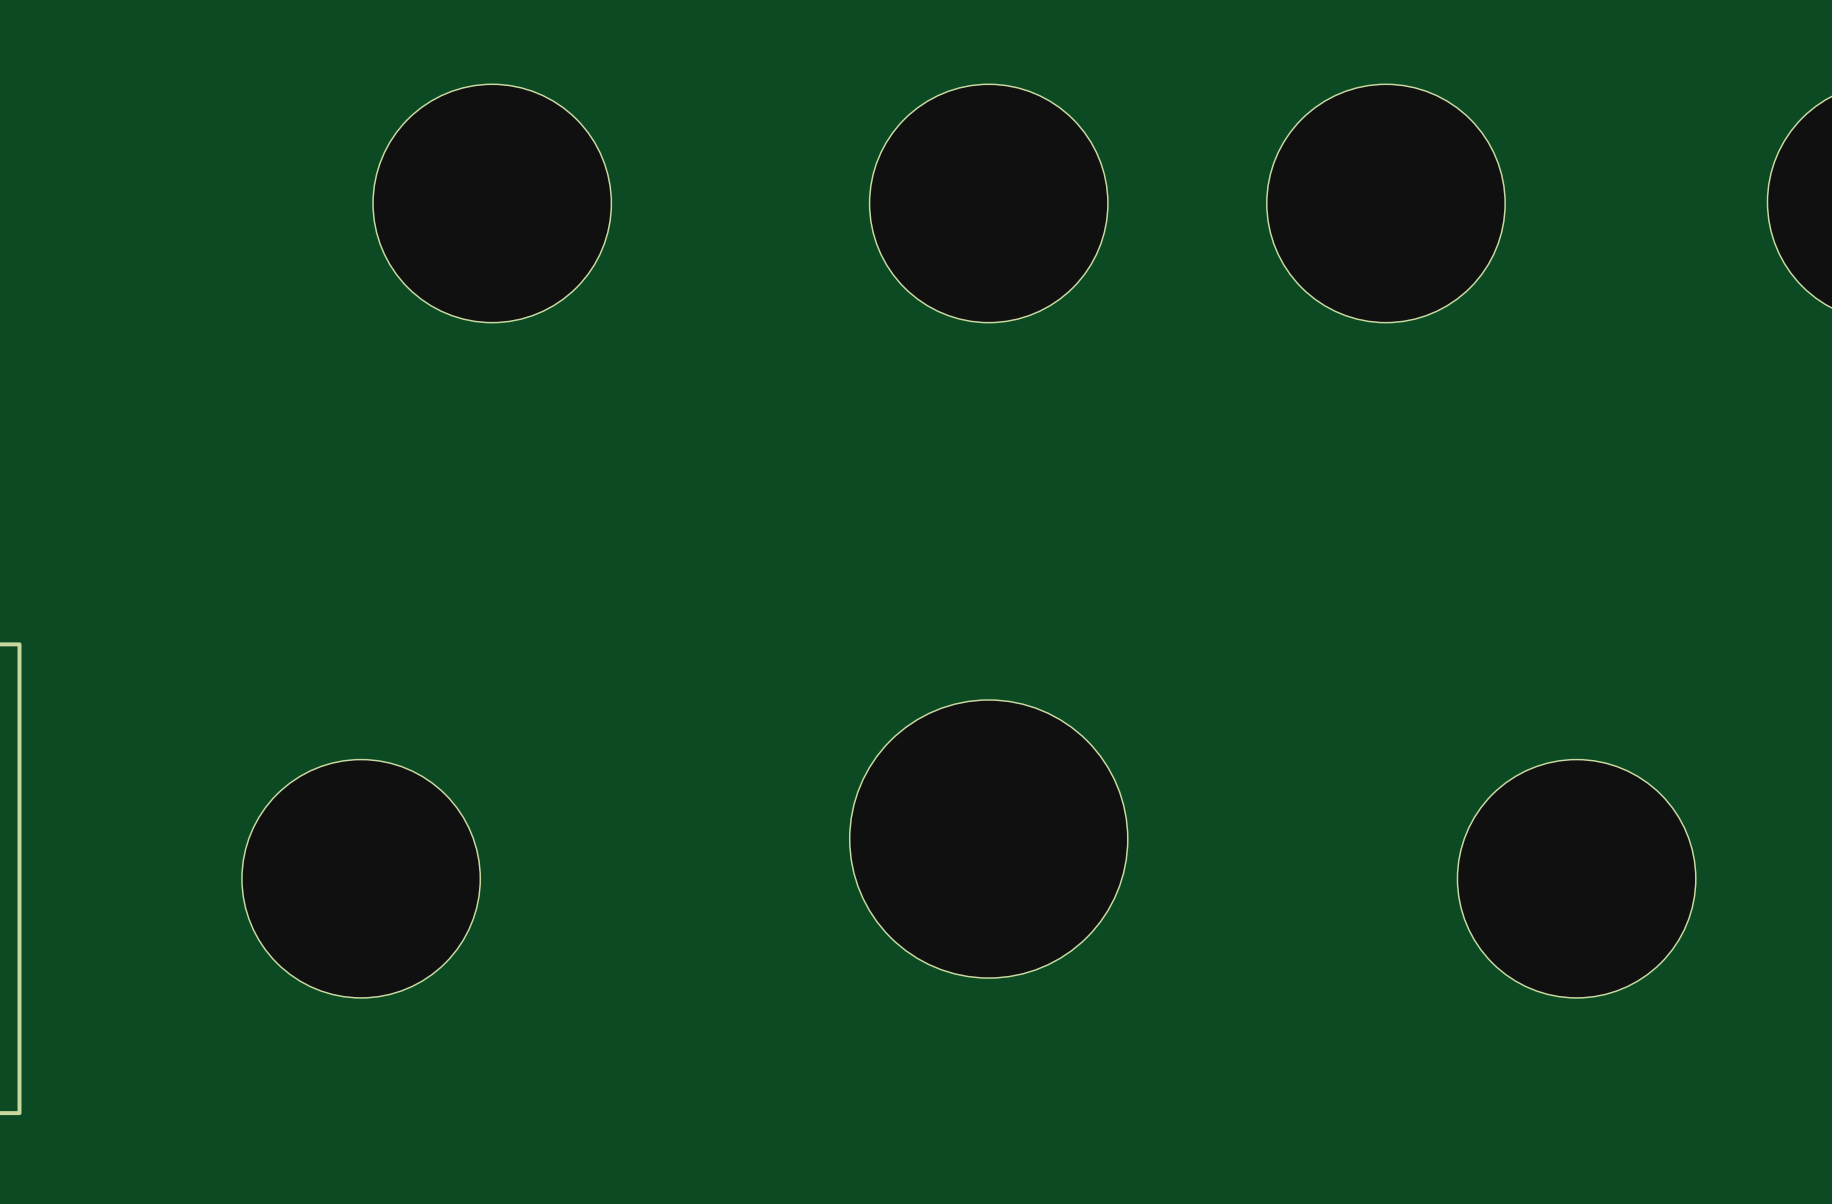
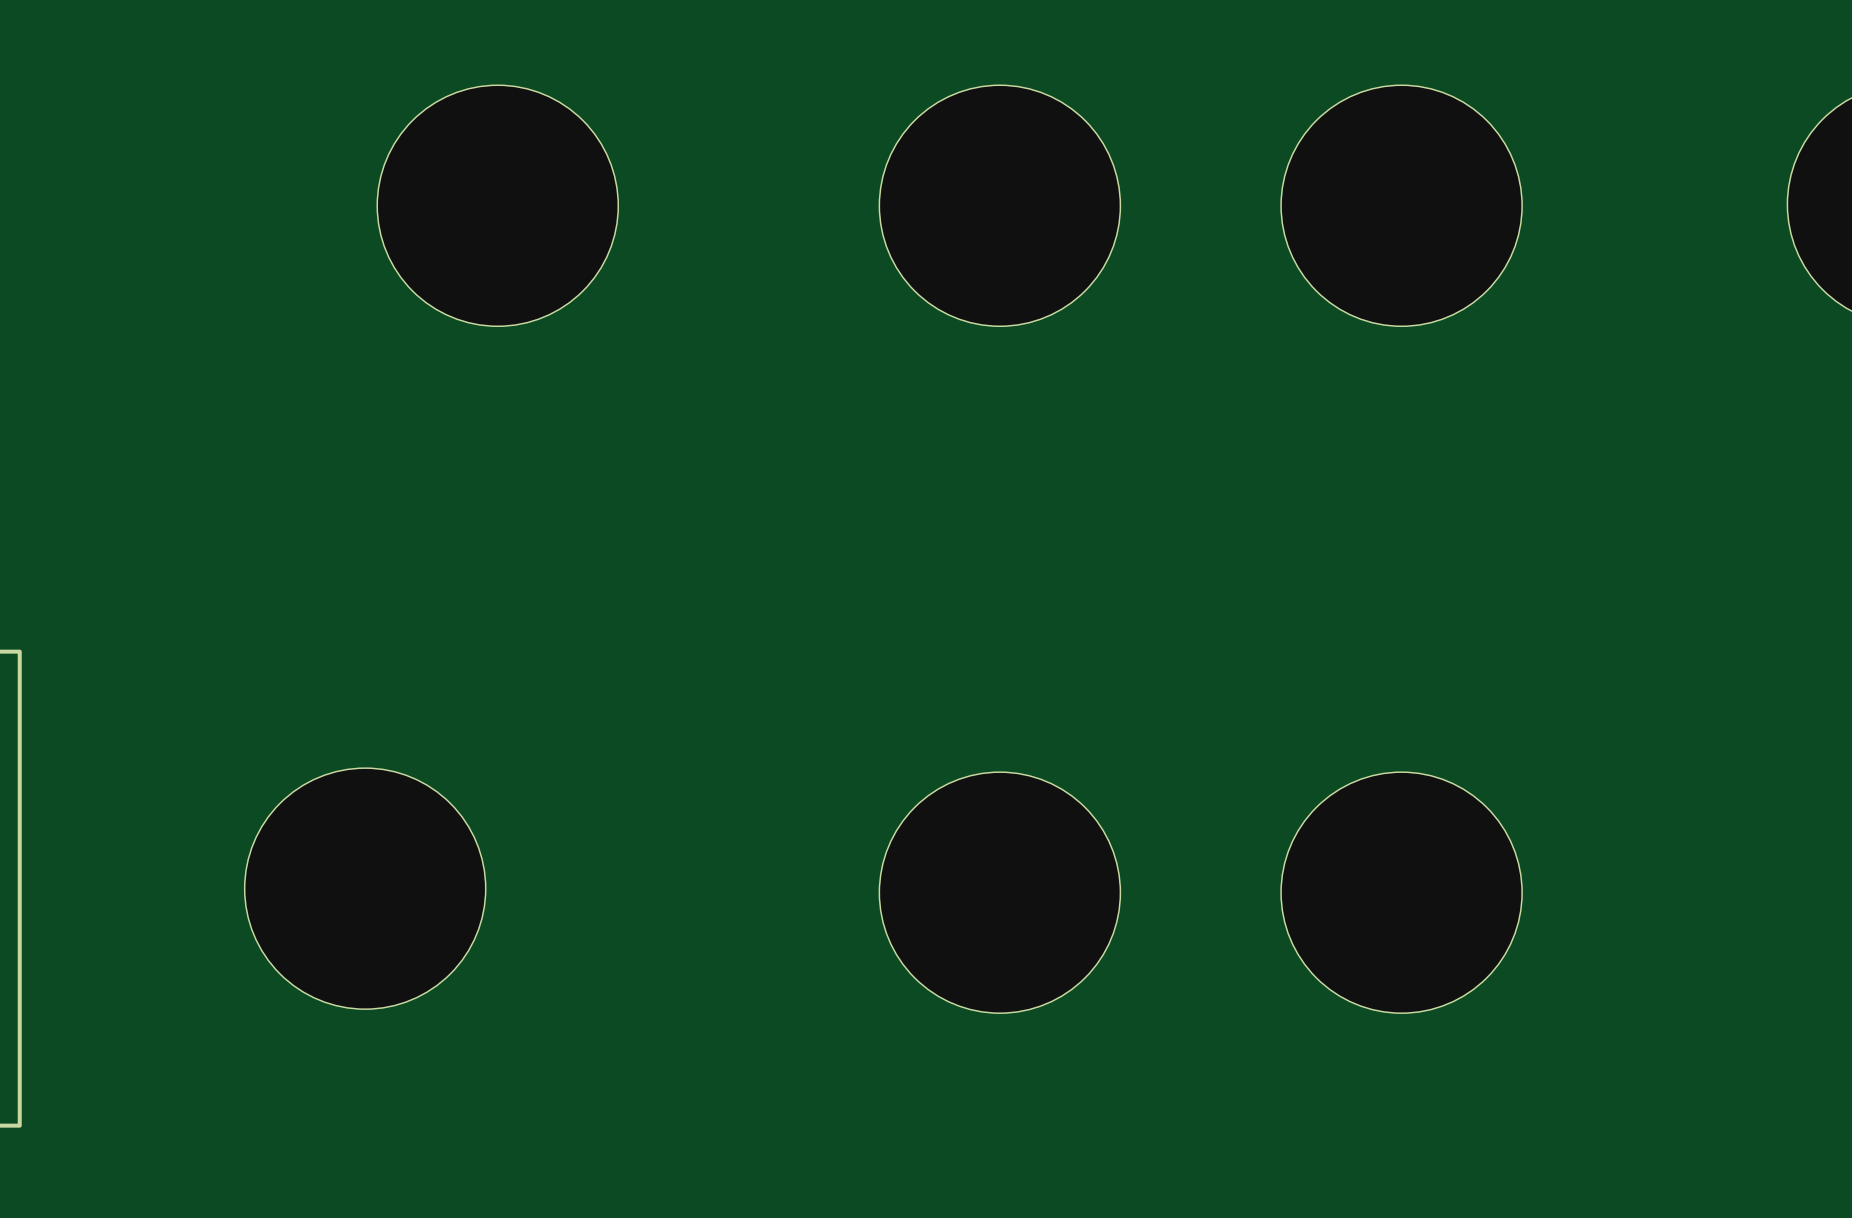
part: (988, 839) -> none
part position: (1576, 878) -> (1401, 892)
part: none -> (999, 892)

